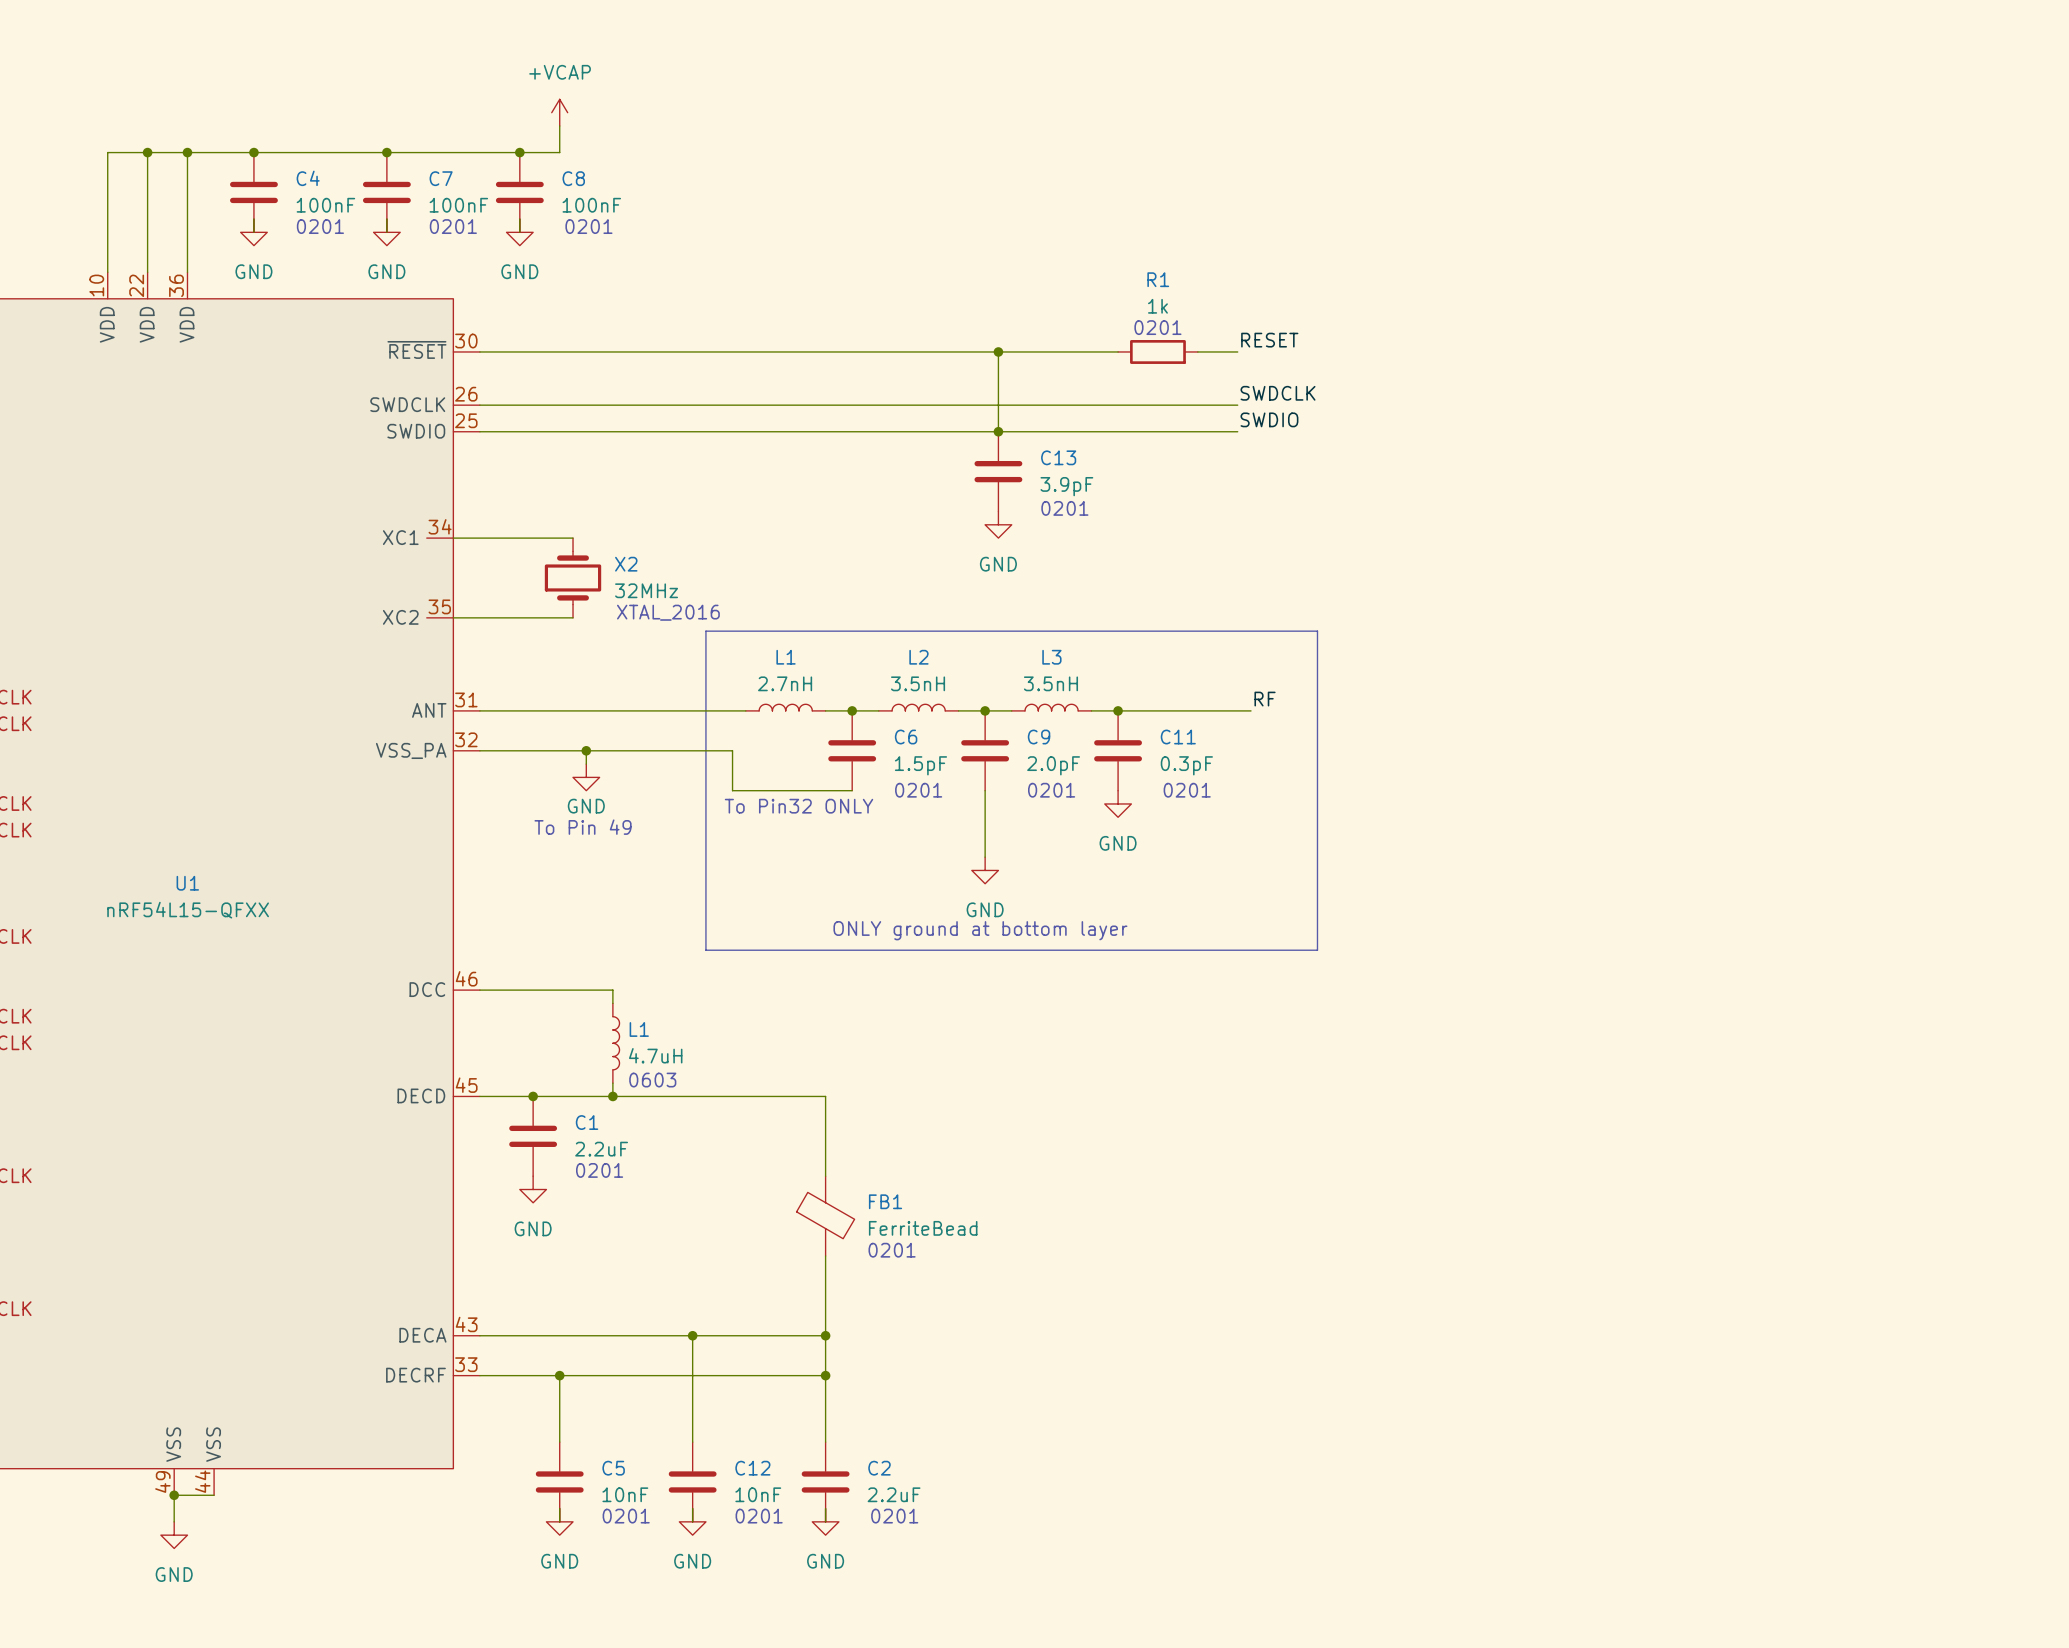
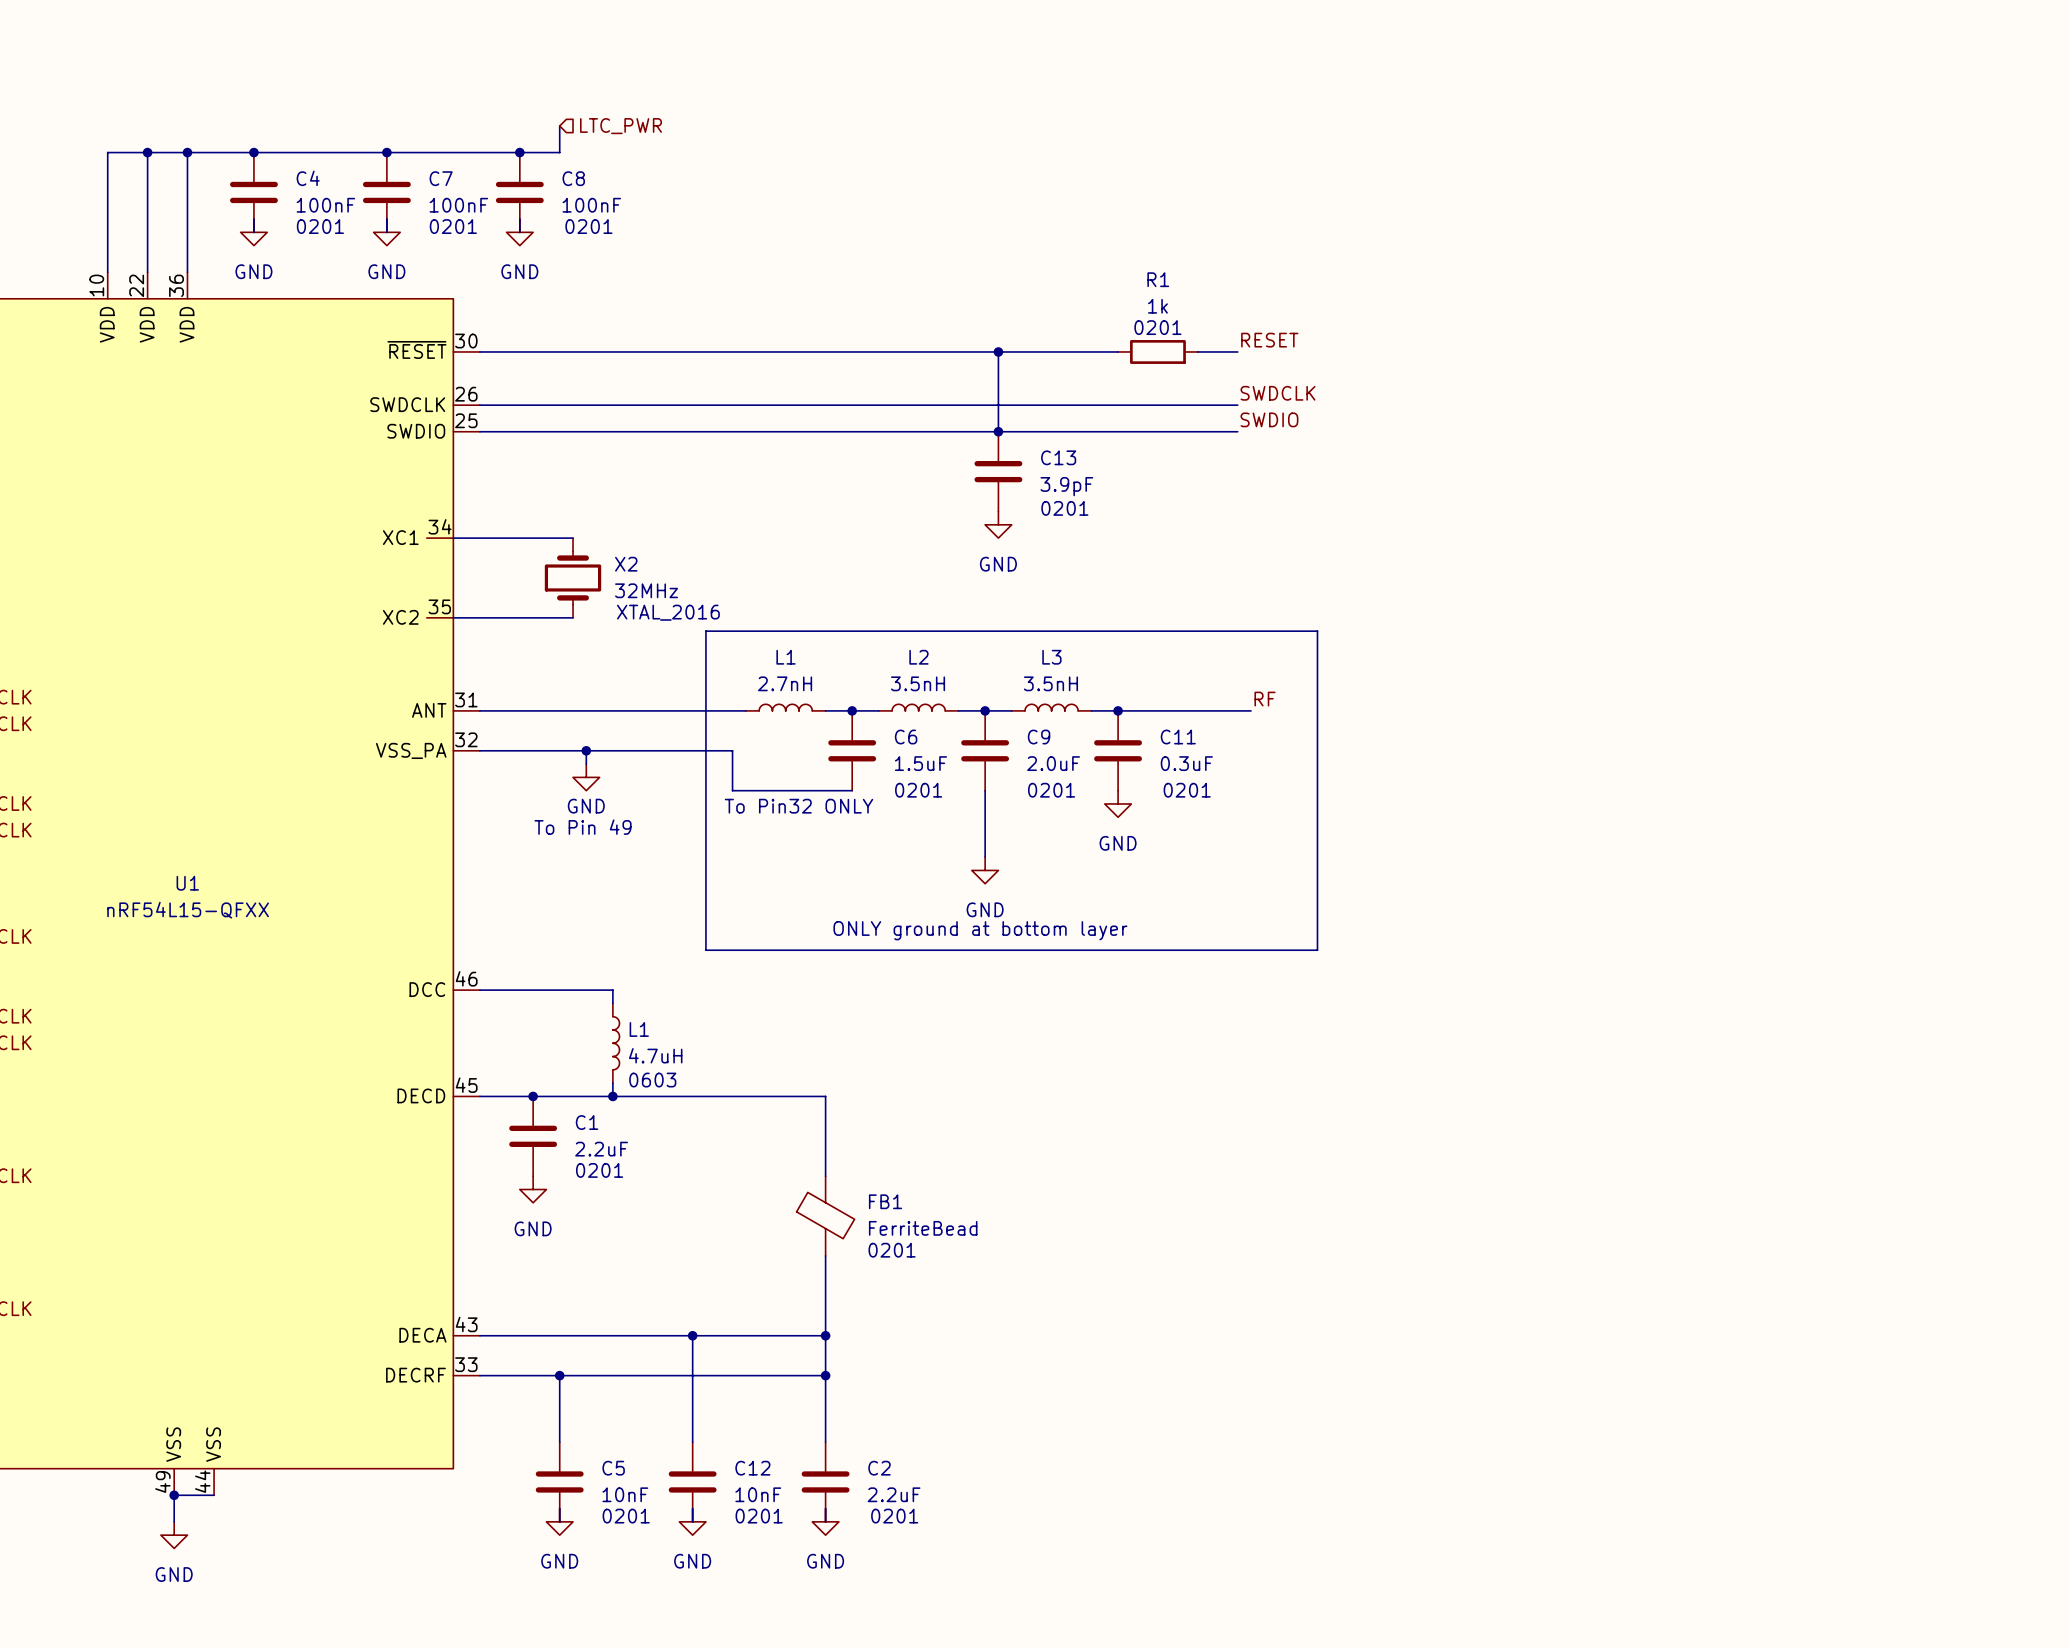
power symbol: +VCAP (559, 112) -> none
hierarchical label: none -> LTC_PWR (621, 126)
C6 value: 1.5pF (920, 765) -> 1.5uF (920, 763)
C9 value: 2.0pF (1053, 765) -> 2.0uF (1053, 763)
C11 value: 0.3pF (1186, 765) -> 0.3uF (1186, 763)

